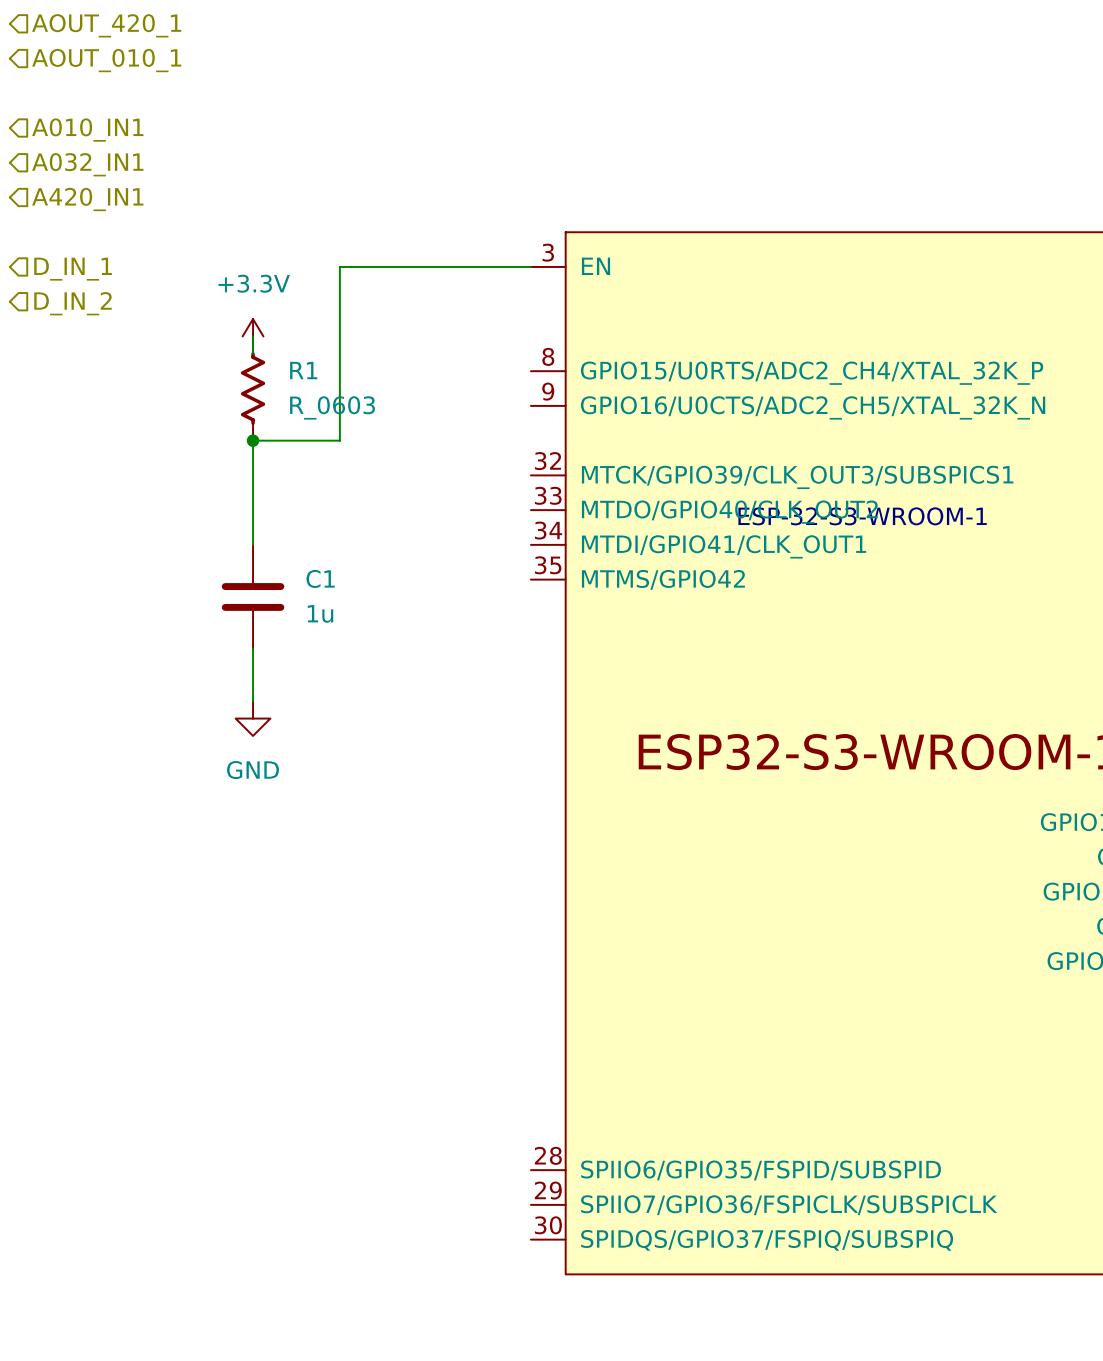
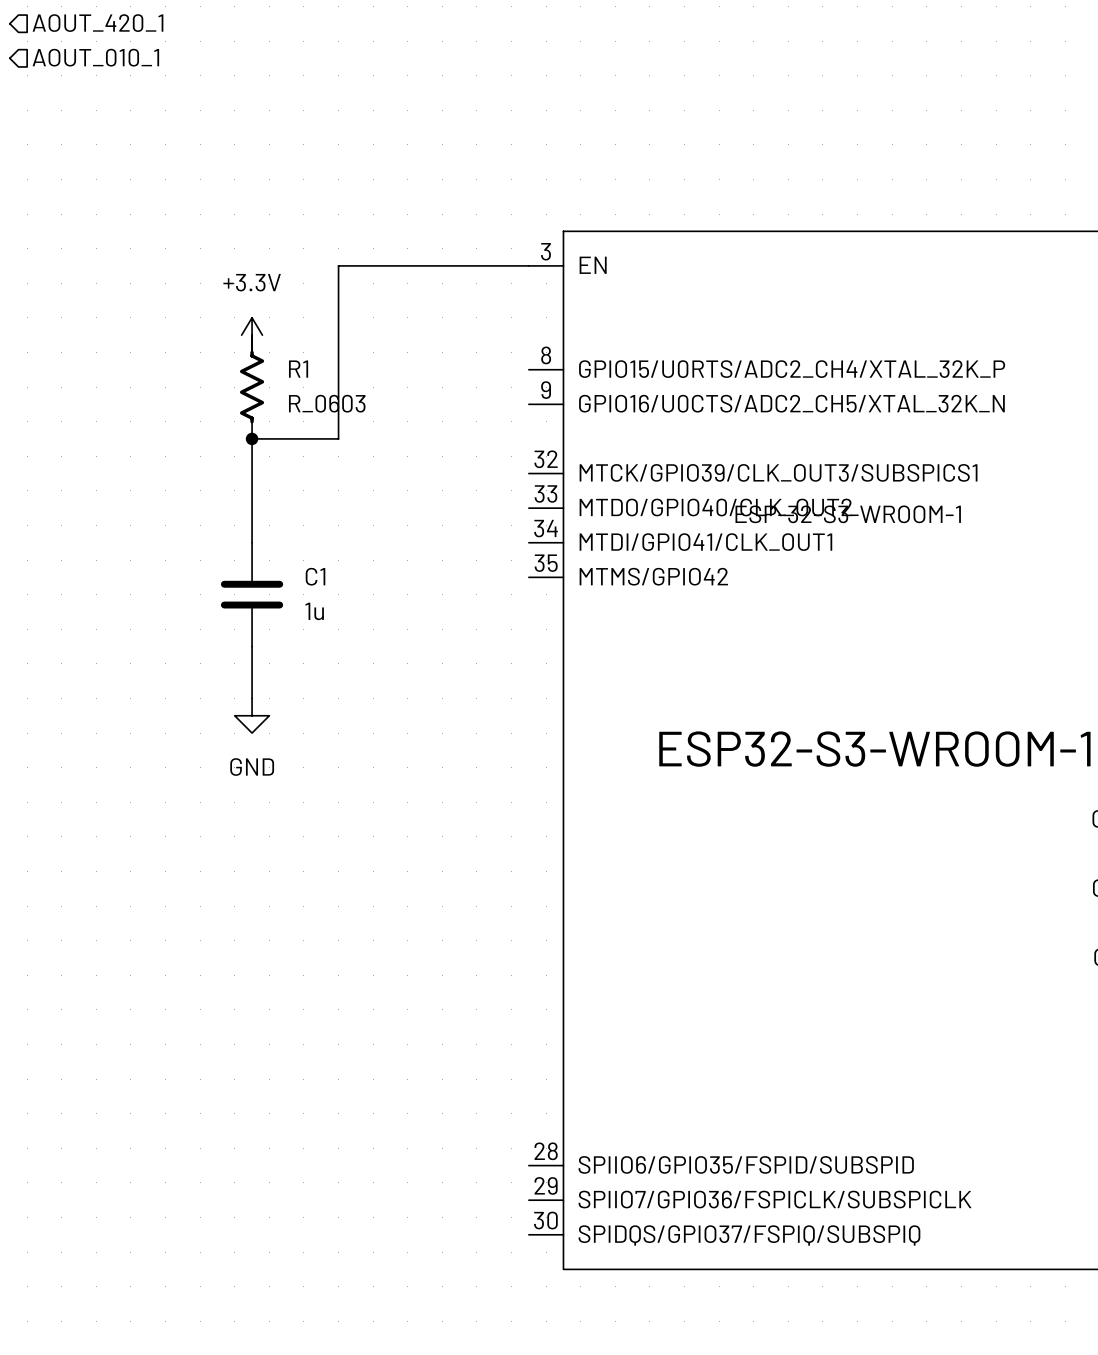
hierarchical label: A010_IN1 (87, 130) -> none
hierarchical label: A032_IN1 (87, 164) -> none
hierarchical label: A420_IN1 (87, 199) -> none
hierarchical label: D_IN_1 (73, 269) -> none
hierarchical label: D_IN_2 (72, 303) -> none

